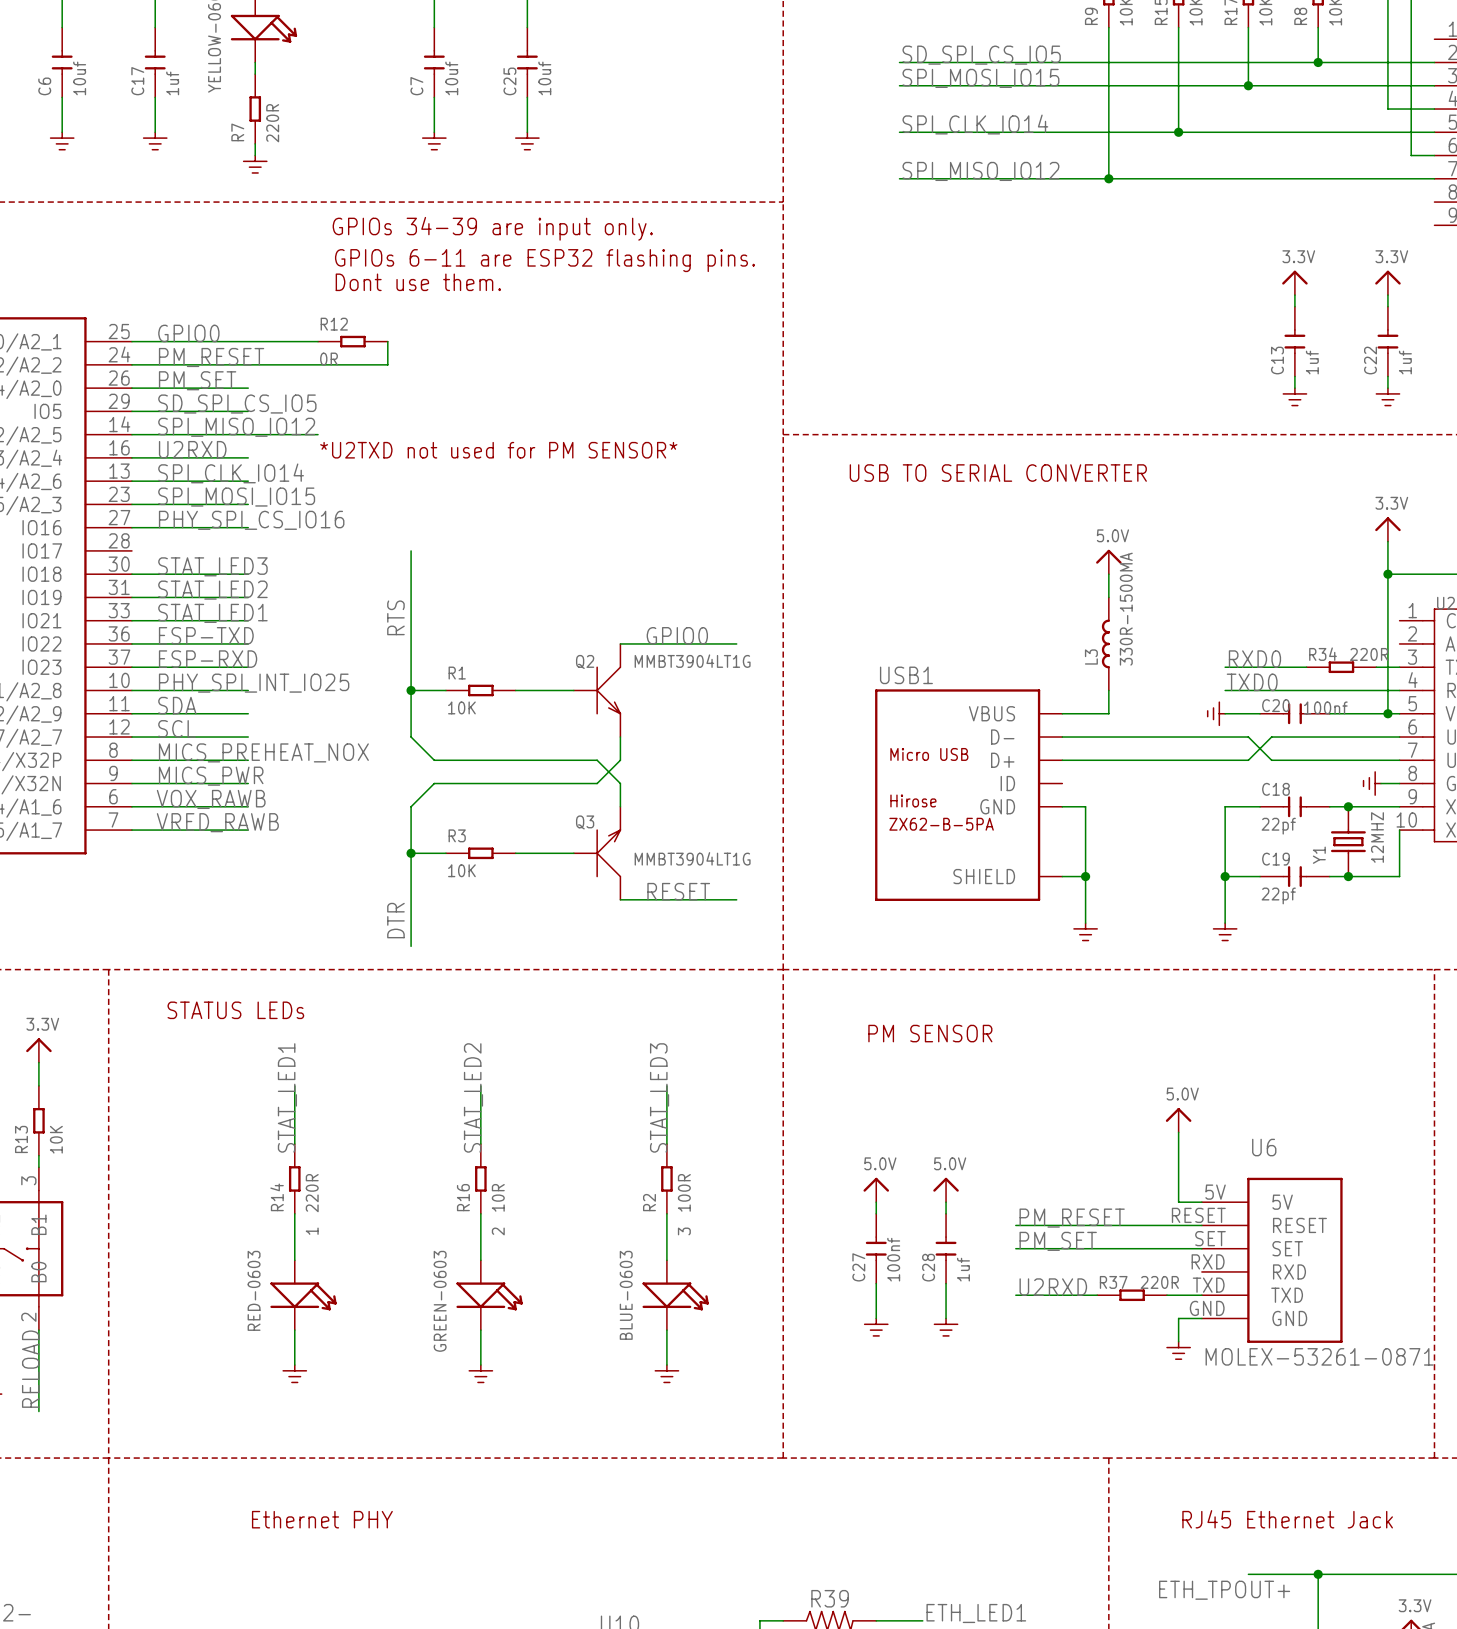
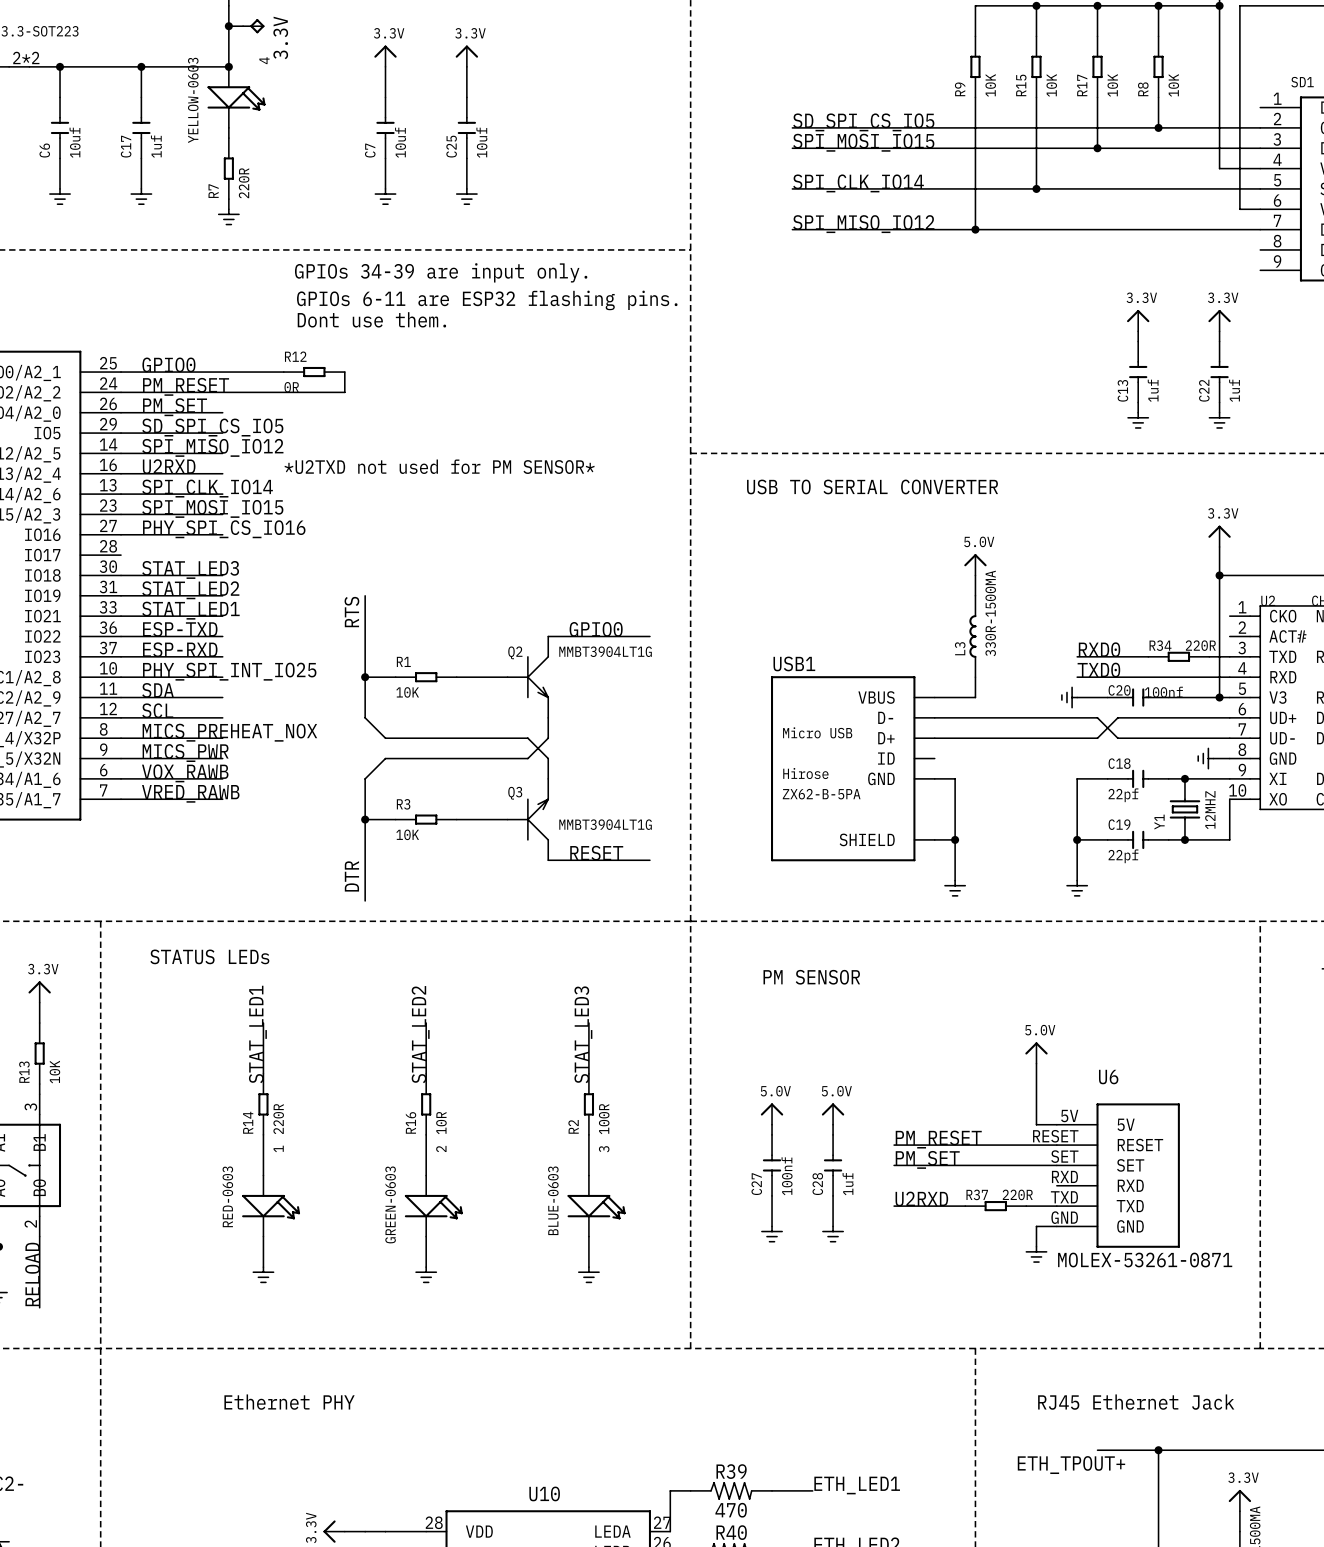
wire: (248, 434) (318, 434) -> none
wire: (411, 550) (411, 597) -> none

